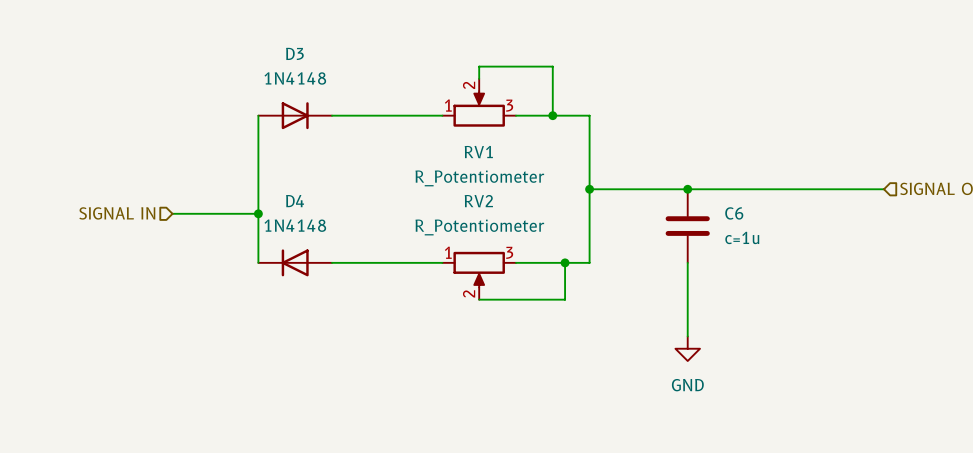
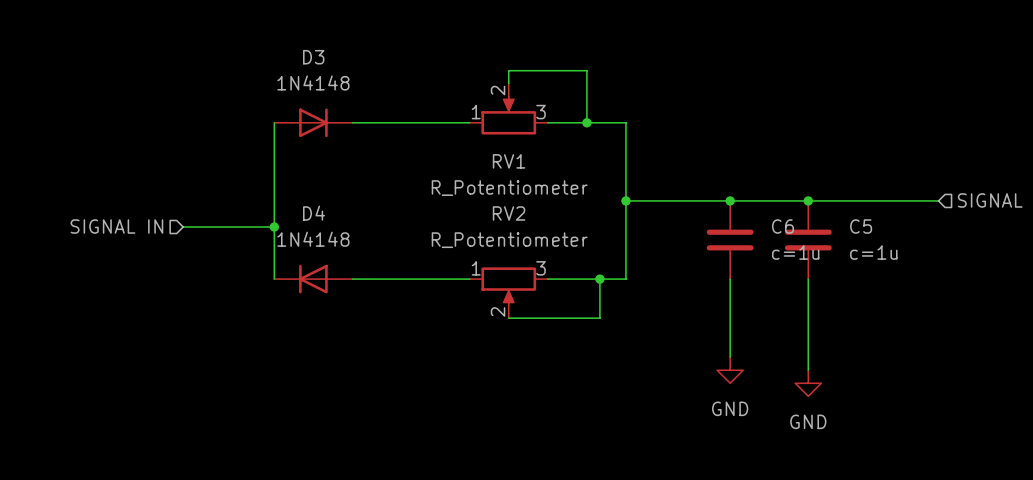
junction: none -> (808, 200)
C5: none -> c=1u (808, 240)
wire: none -> (808, 279) (808, 370)
power symbol: none -> GND (808, 383)

